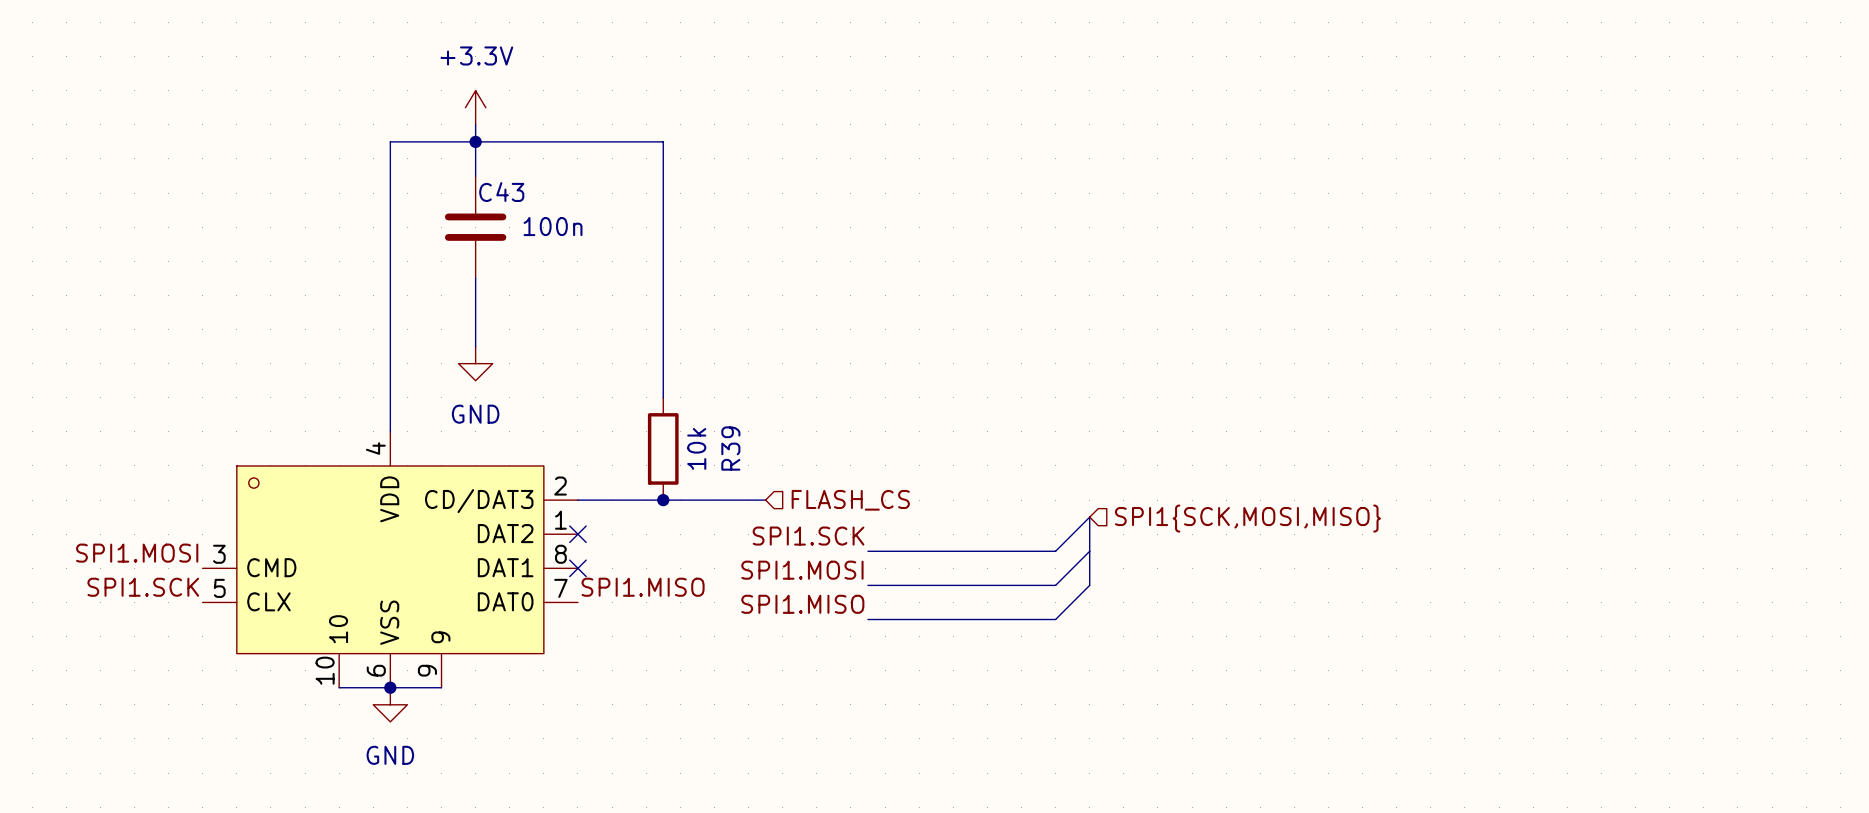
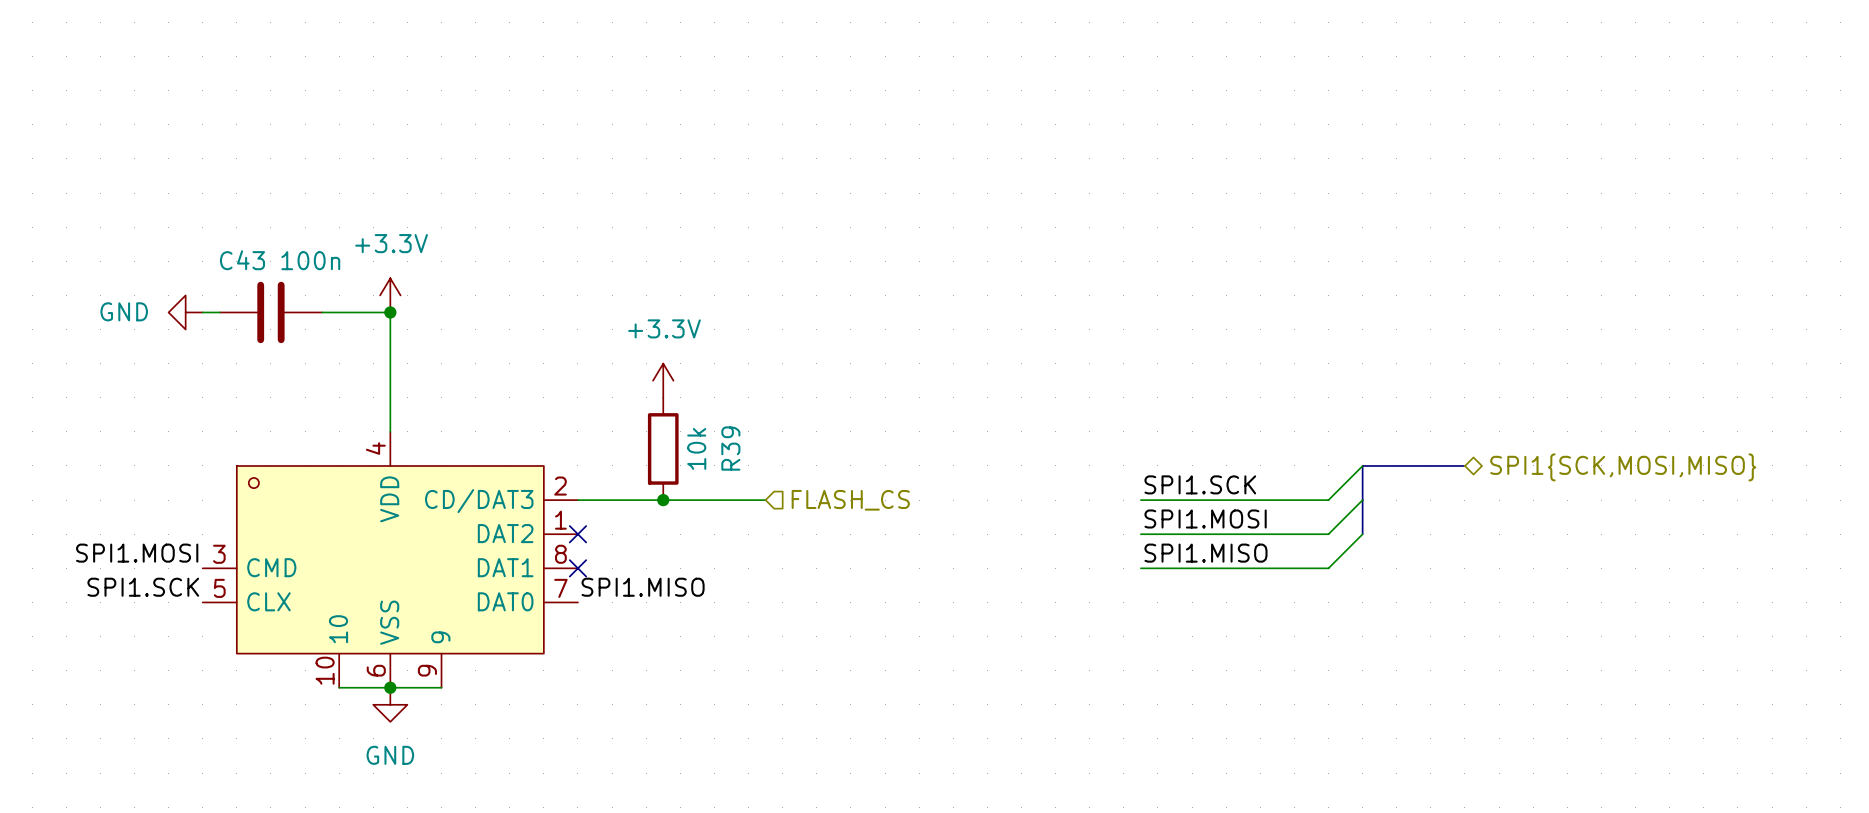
power symbol: +3.3V (475, 107) -> none
wire: (475, 124) (475, 176) -> none
junction: (475, 141) -> none
C43 name position: C43 (501, 192) -> C43 (242, 260)
C43 value position: 100n (553, 226) -> 100n (310, 260)
C43 rotation: 0° (475, 227) -> 90° clockwise (270, 312)
C43 position: (475, 227) -> (270, 312)
wire: (475, 278) (475, 346) -> none
power symbol: none -> +3.3V (390, 295)
wire: none -> (202, 312) (219, 312)
wire: (390, 312) (390, 141) (663, 141) (663, 397) -> (390, 312) (322, 312)
junction: none -> (390, 312)
power symbol rotation: 0° (475, 363) -> 90° clockwise (185, 312)
power symbol position: GND (475, 363) -> GND (185, 312)
power symbol: none -> +3.3V (663, 380)
bus: none -> (1464, 465) (1362, 465) (1362, 534)
hierarchical label: none -> SPI1{SCK,MOSI,MISO} (1623, 467)
wire: (1089, 517) (1055, 551) (867, 551) -> (1362, 465) (1328, 500) (1140, 500)
bus: (1089, 517) (1089, 585) -> none
hierarchical label: SPI1{SCK,MOSI,MISO} (1247, 518) -> none
label position: SPI1.SCK (808, 536) -> SPI1.SCK (1200, 484)
wire: (1089, 551) (1055, 585) (867, 585) -> (1362, 500) (1328, 534) (1140, 534)
label position: SPI1.MOSI (802, 570) -> SPI1.MOSI (1205, 519)
wire: (1089, 585) (1055, 619) (867, 619) -> (1362, 534) (1328, 568) (1140, 568)
label position: SPI1.MISO (802, 604) -> SPI1.MISO (1205, 553)

